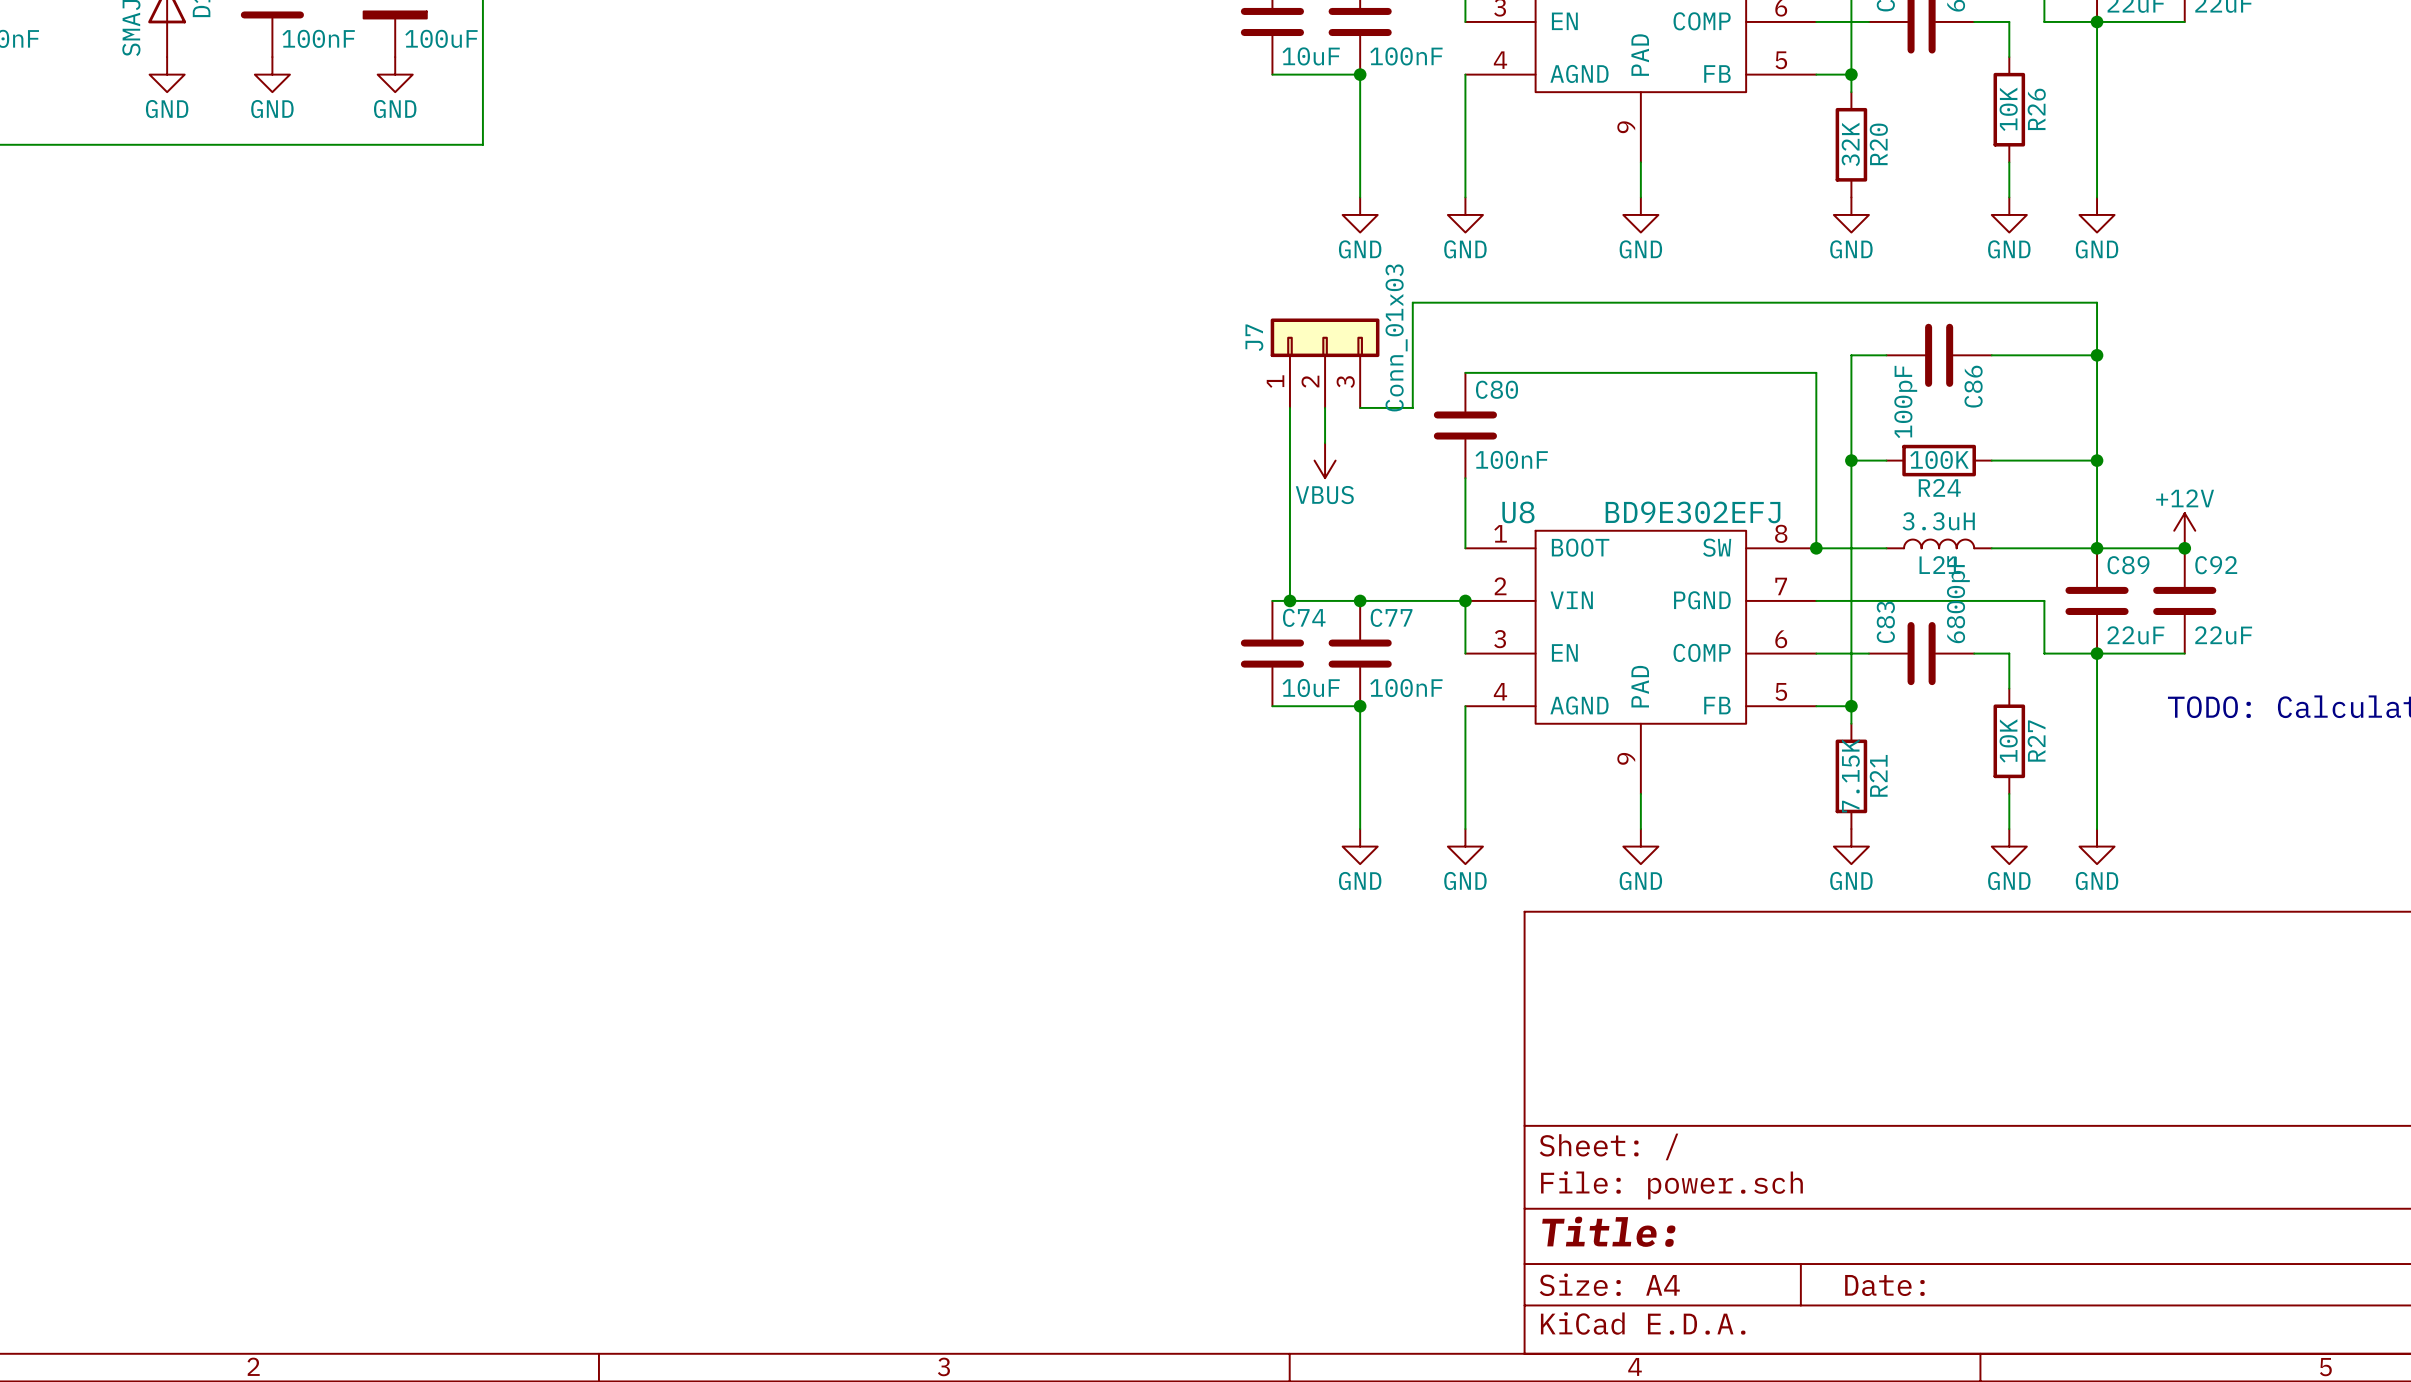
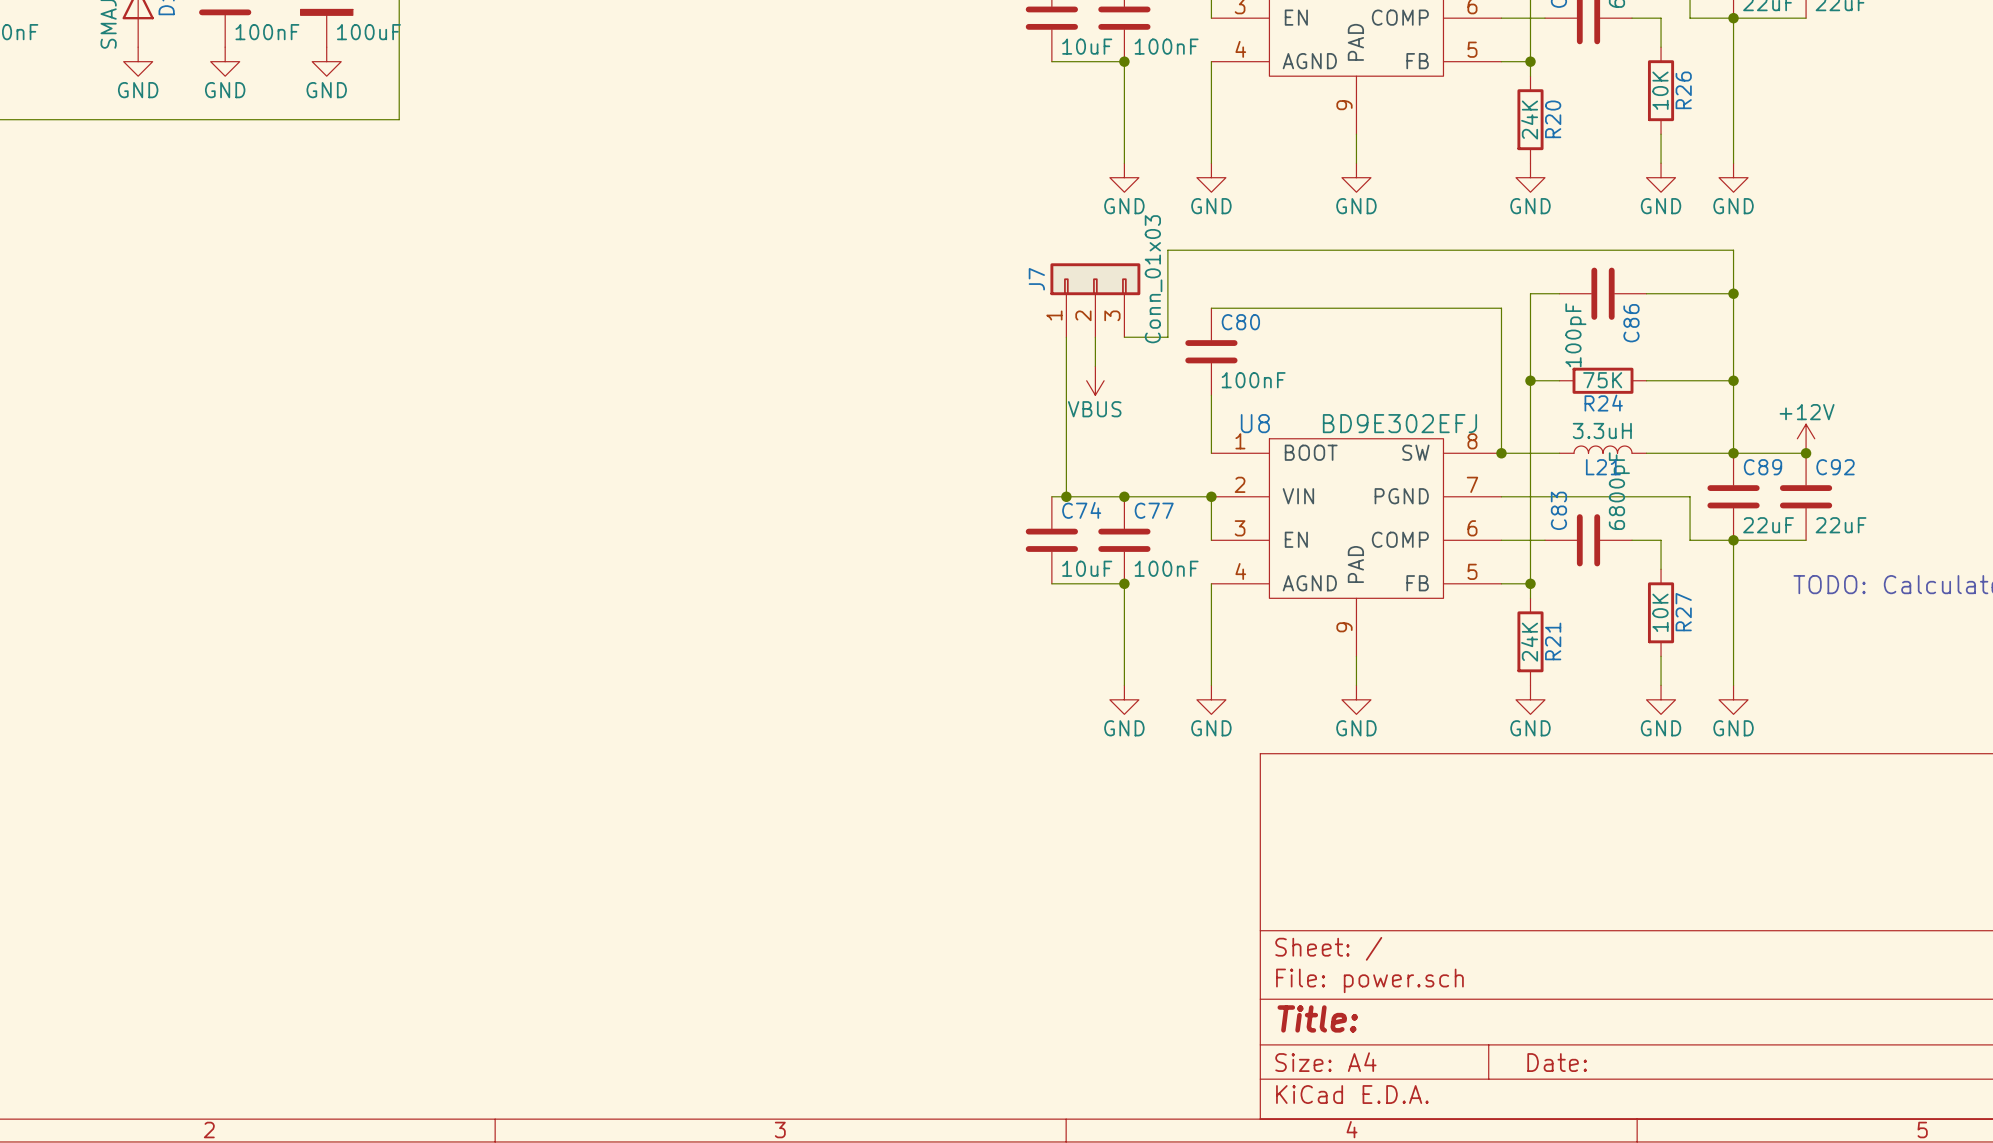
R20 value: 32K (1850, 144) -> 24K (1529, 120)
R24 value: 100K (1939, 459) -> 75K (1602, 380)
R21 value: 7.15K (1850, 775) -> 24K (1529, 642)

